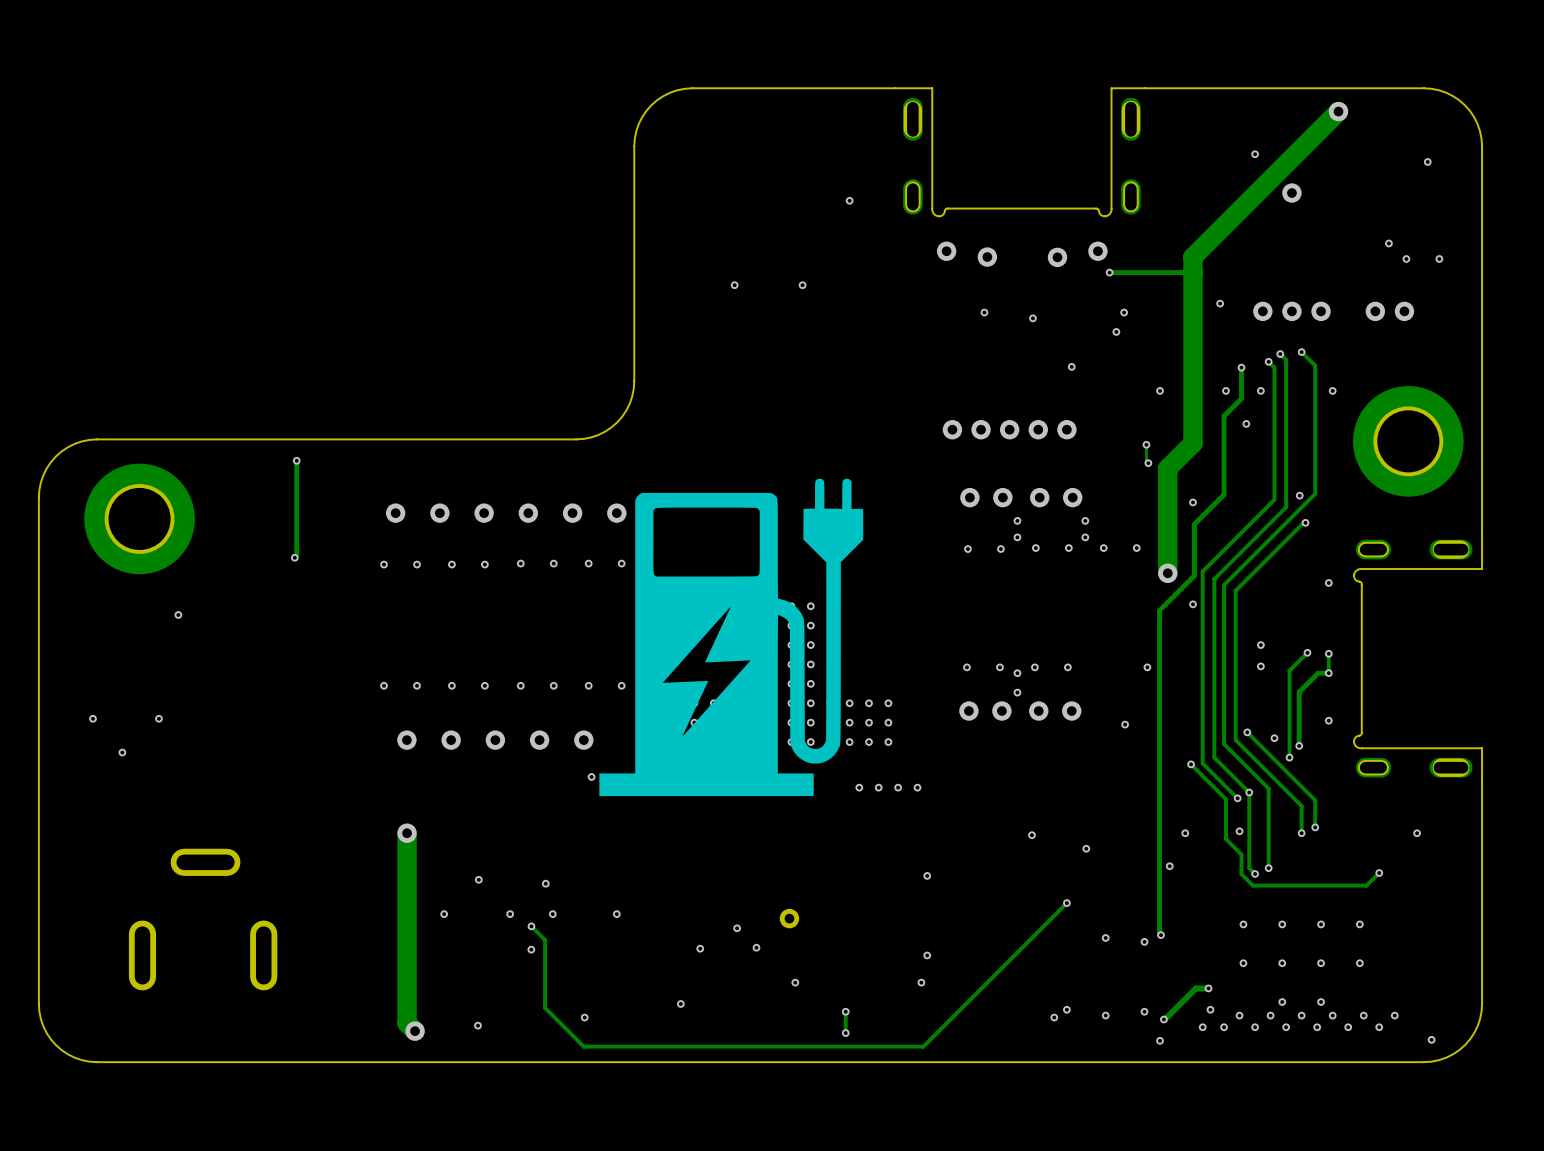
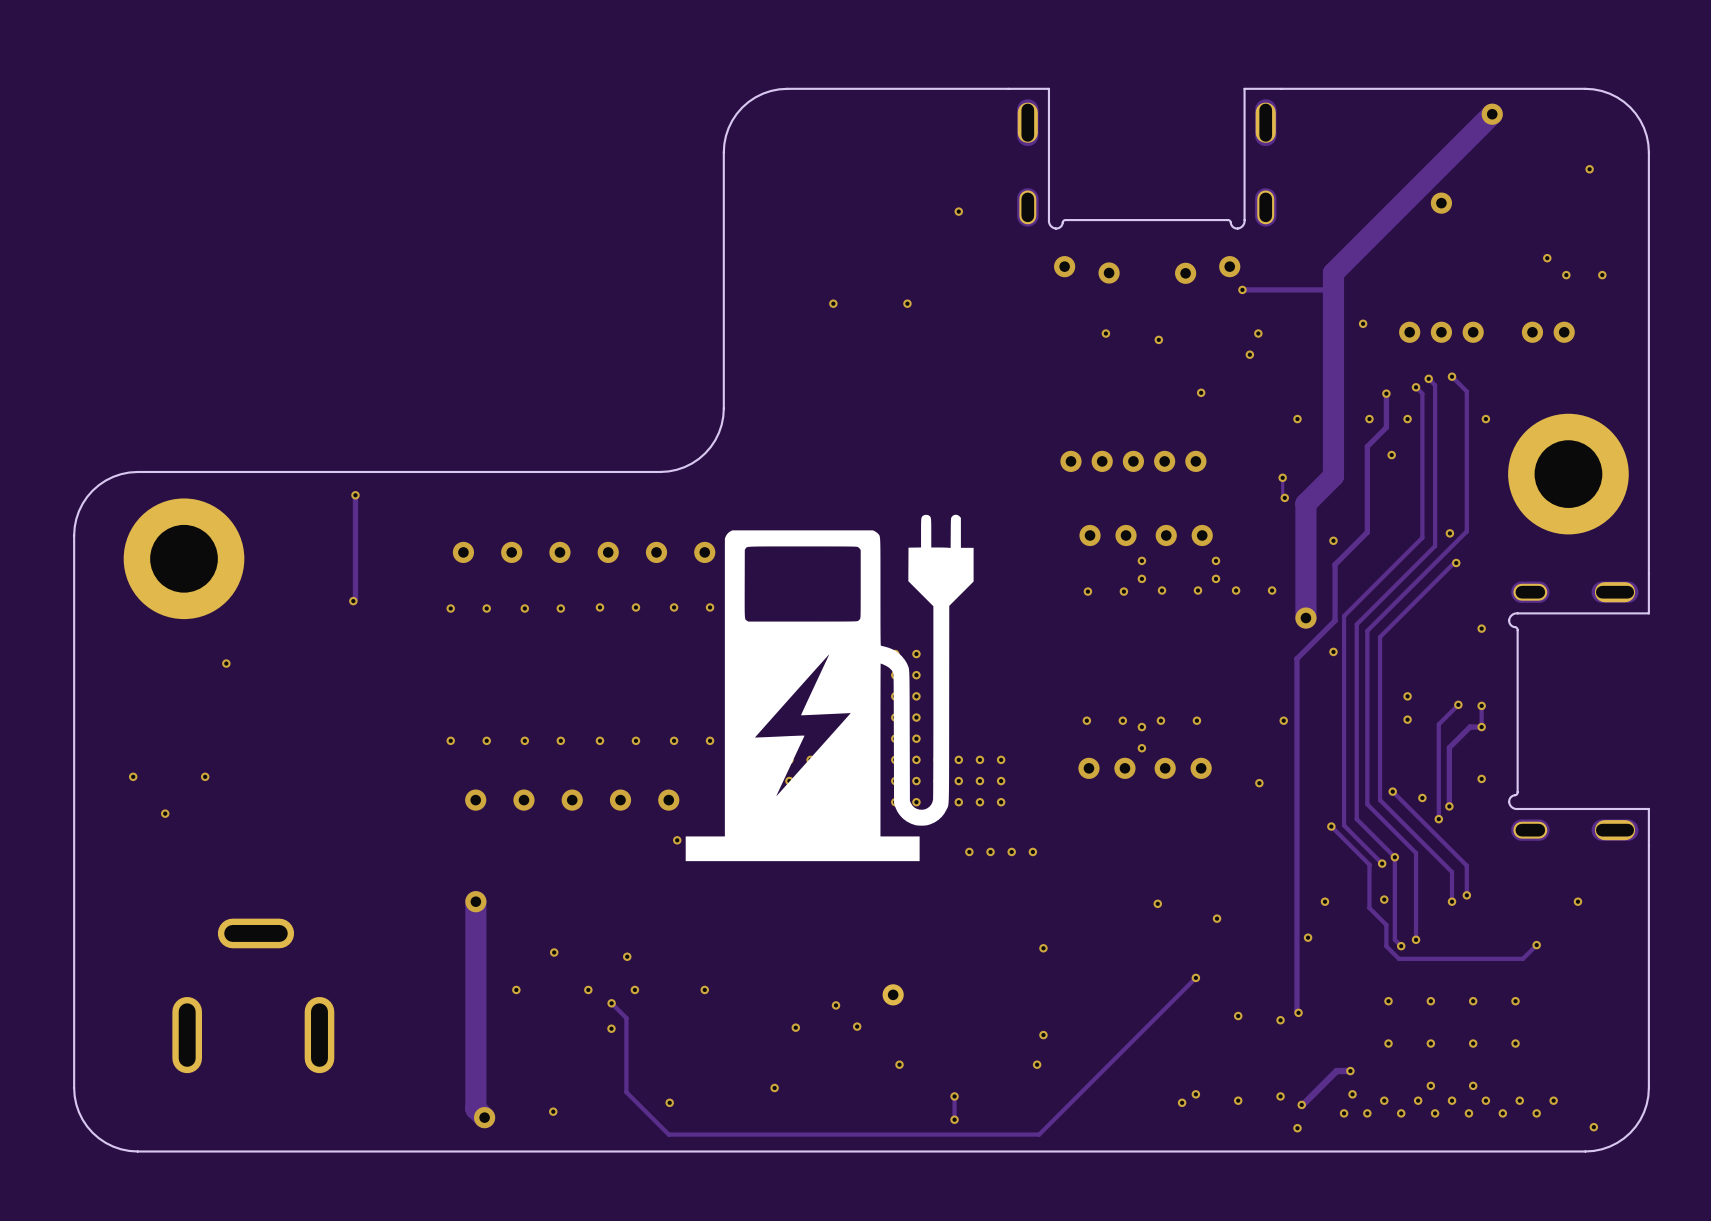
via: (1255, 154) -> none

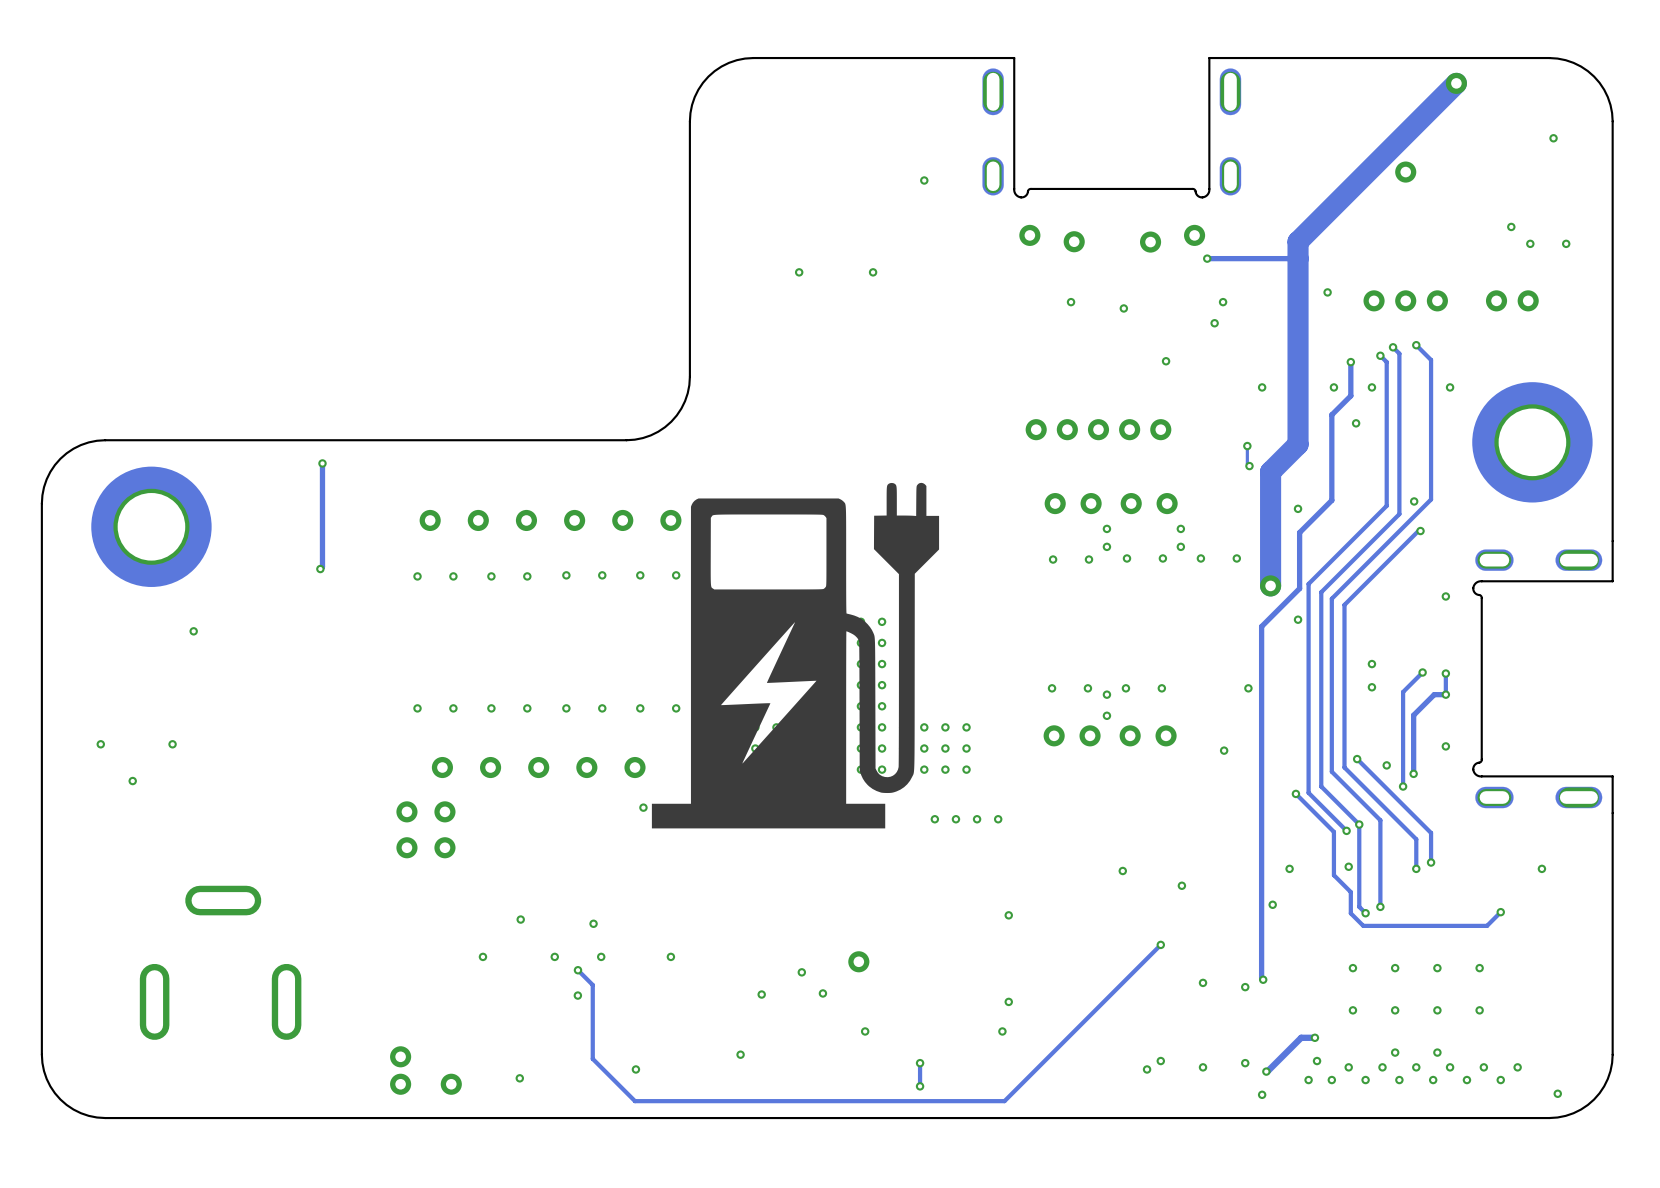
via: none -> (406, 811)
via: none -> (444, 811)
via: none -> (406, 847)
via: none -> (444, 847)
track: (475, 901) (475, 1108) (484, 1117) -> none
via: (475, 901) -> none
via: none -> (400, 1056)
via: none -> (400, 1084)

